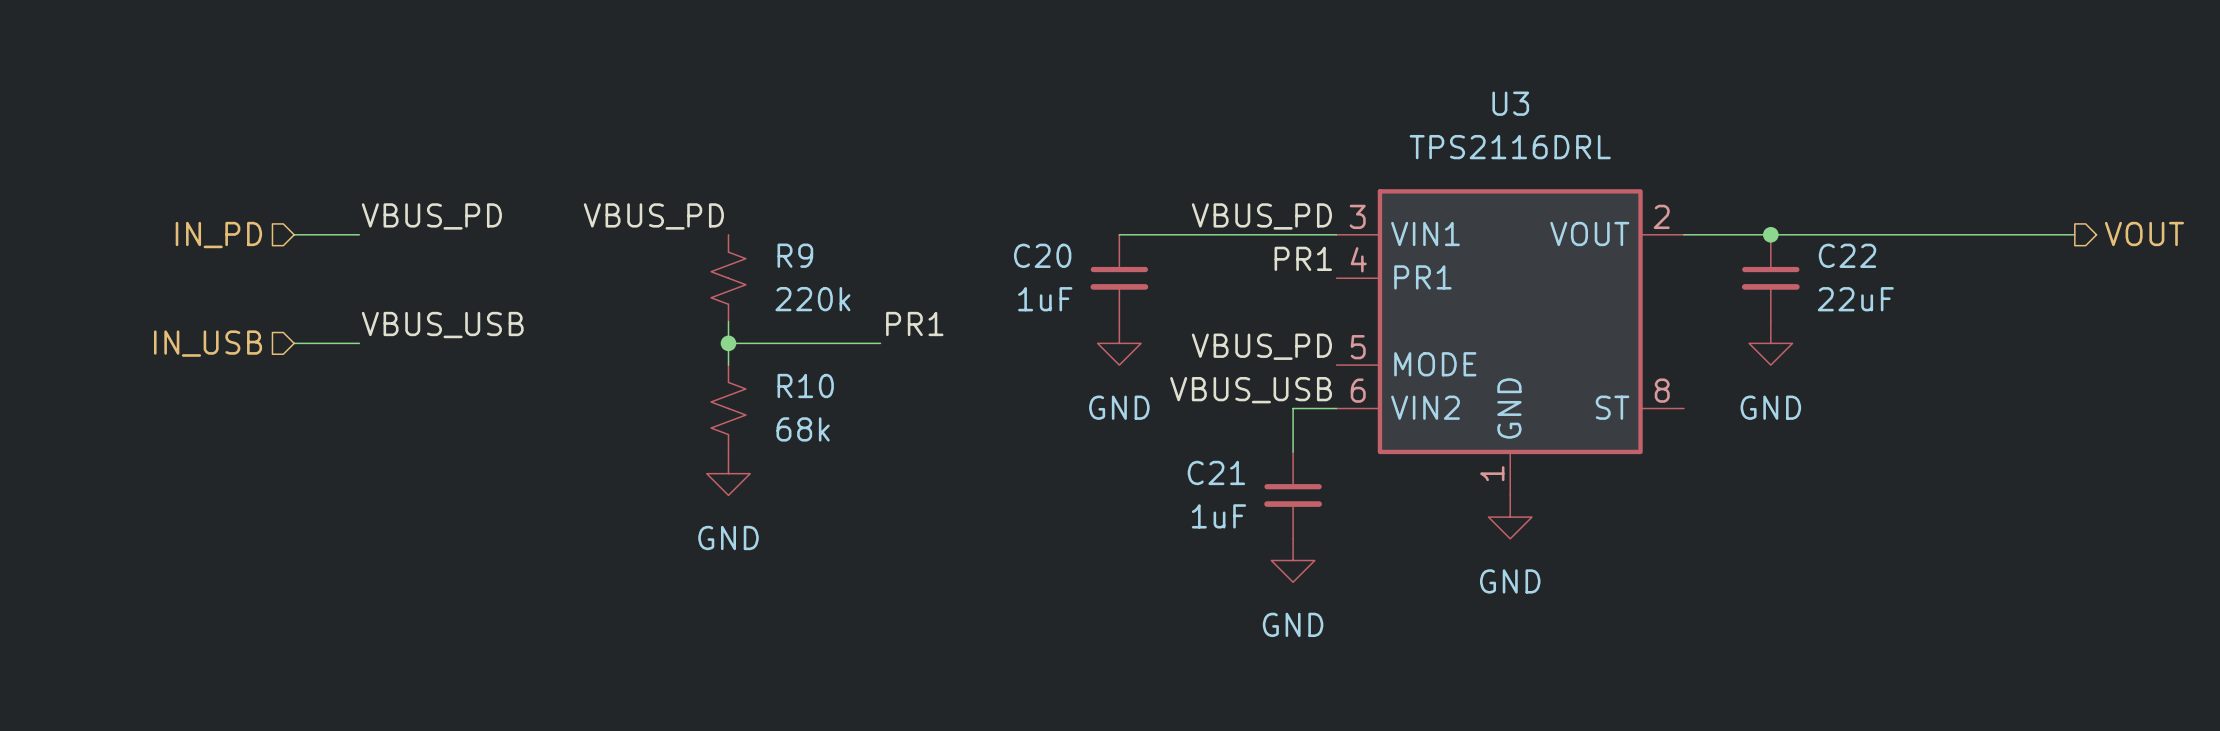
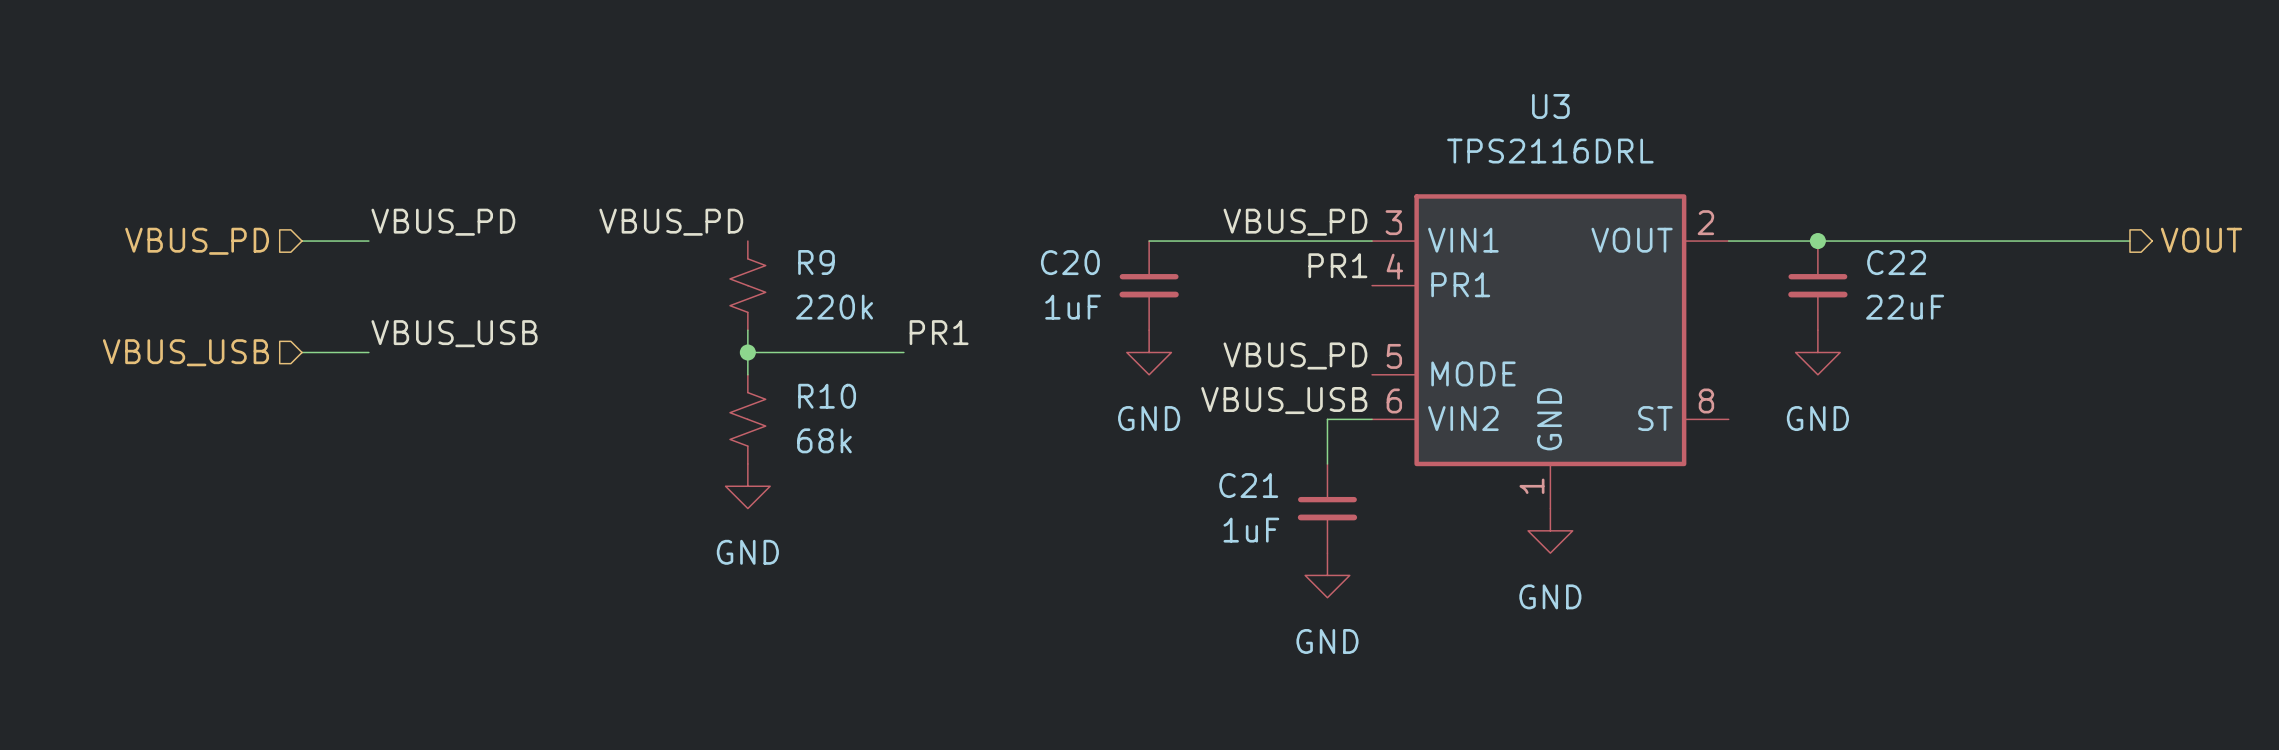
hierarchical label: IN_PD (218, 235) -> VBUS_PD (197, 241)
hierarchical label: IN_USB (208, 343) -> VBUS_USB (185, 352)

